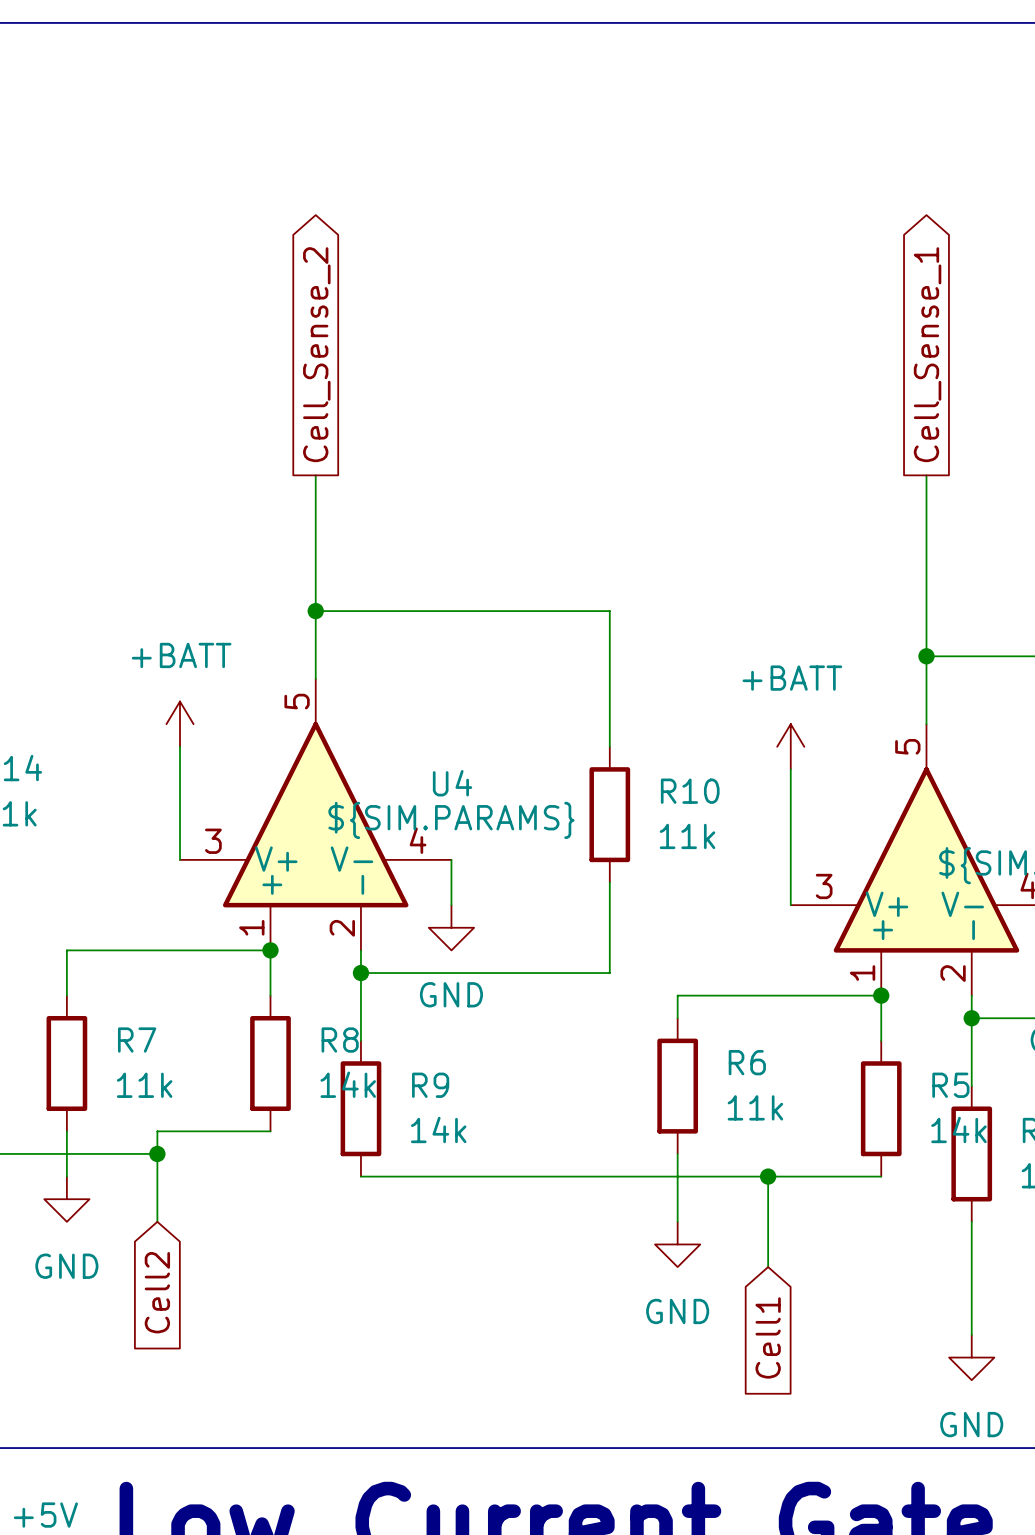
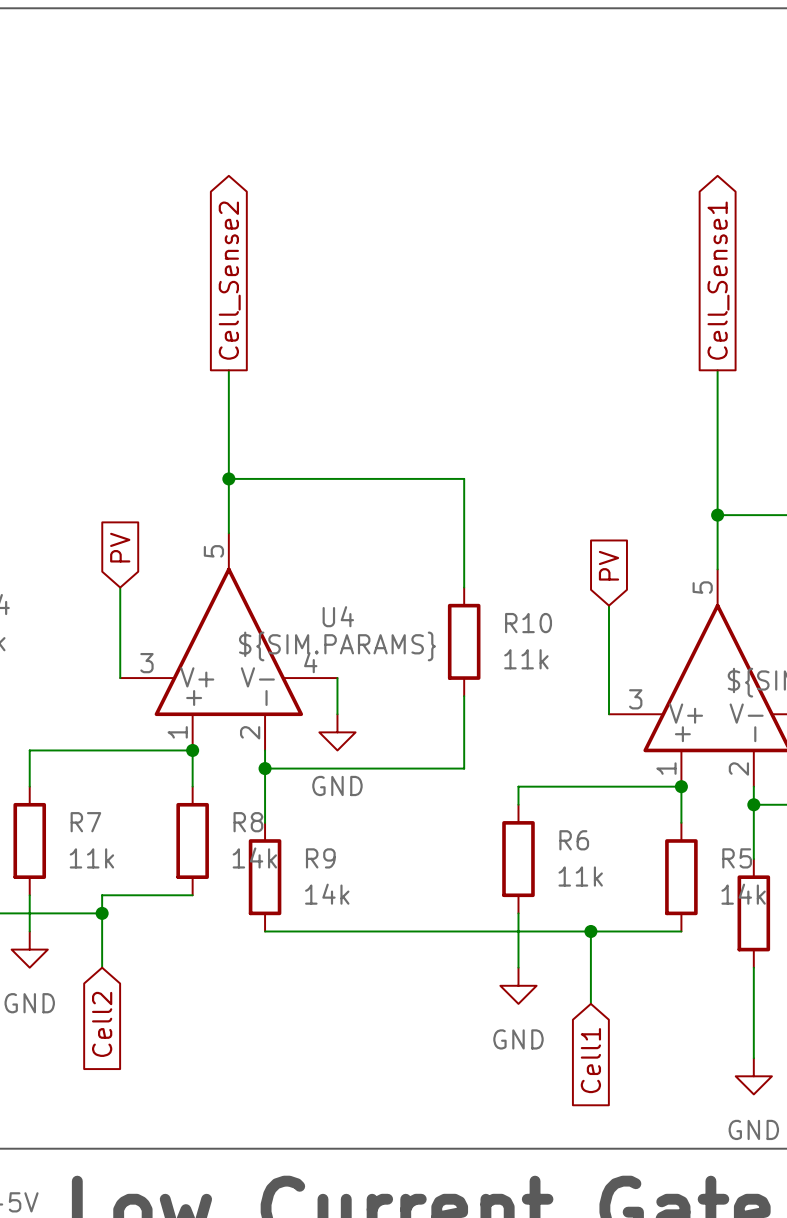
global label: Cell_Sense_2 (316, 354) -> Cell_Sense2 (229, 280)
global label: Cell_Sense_1 (927, 354) -> Cell_Sense1 (718, 280)
global label: none -> PV (120, 547)
global label: none -> PV (609, 565)
power symbol: +BATT (180, 724) -> none
power symbol: +BATT (790, 746) -> none

